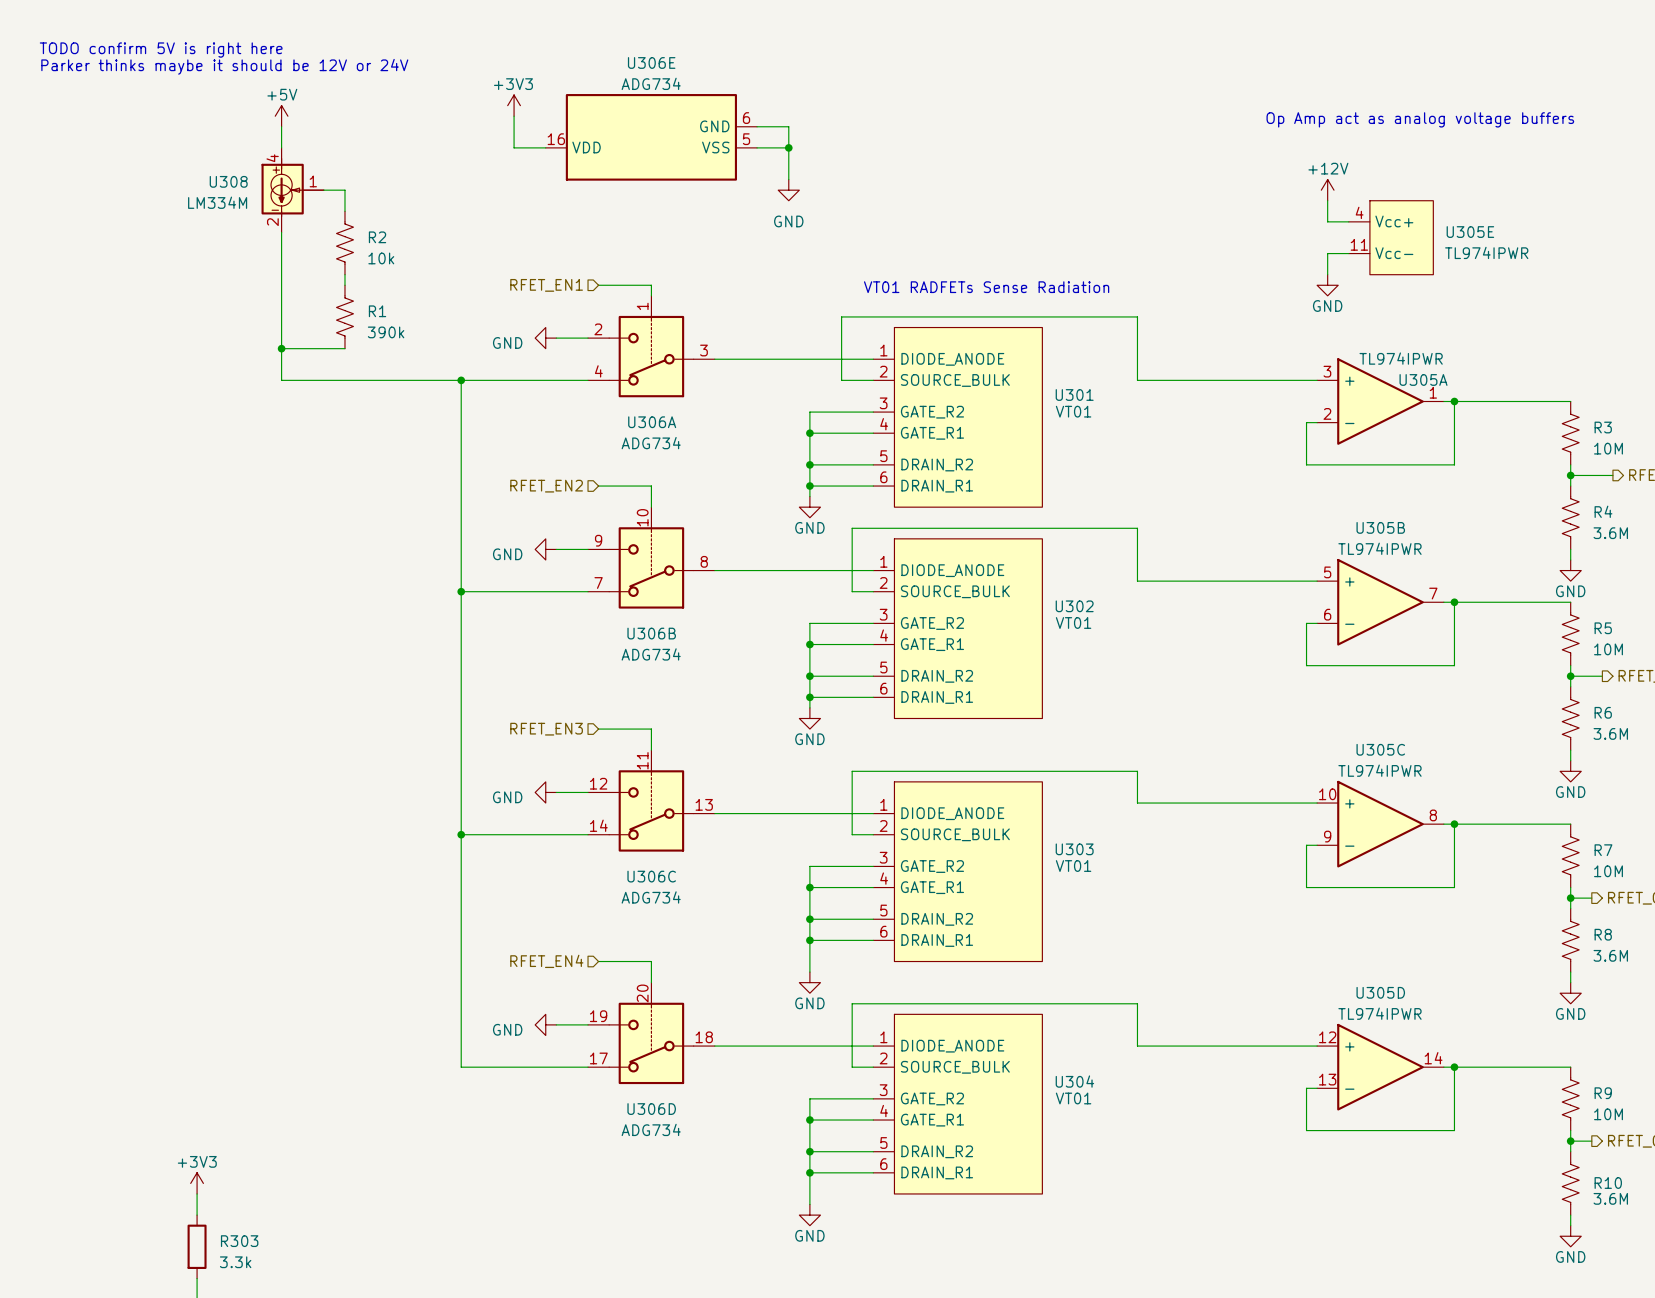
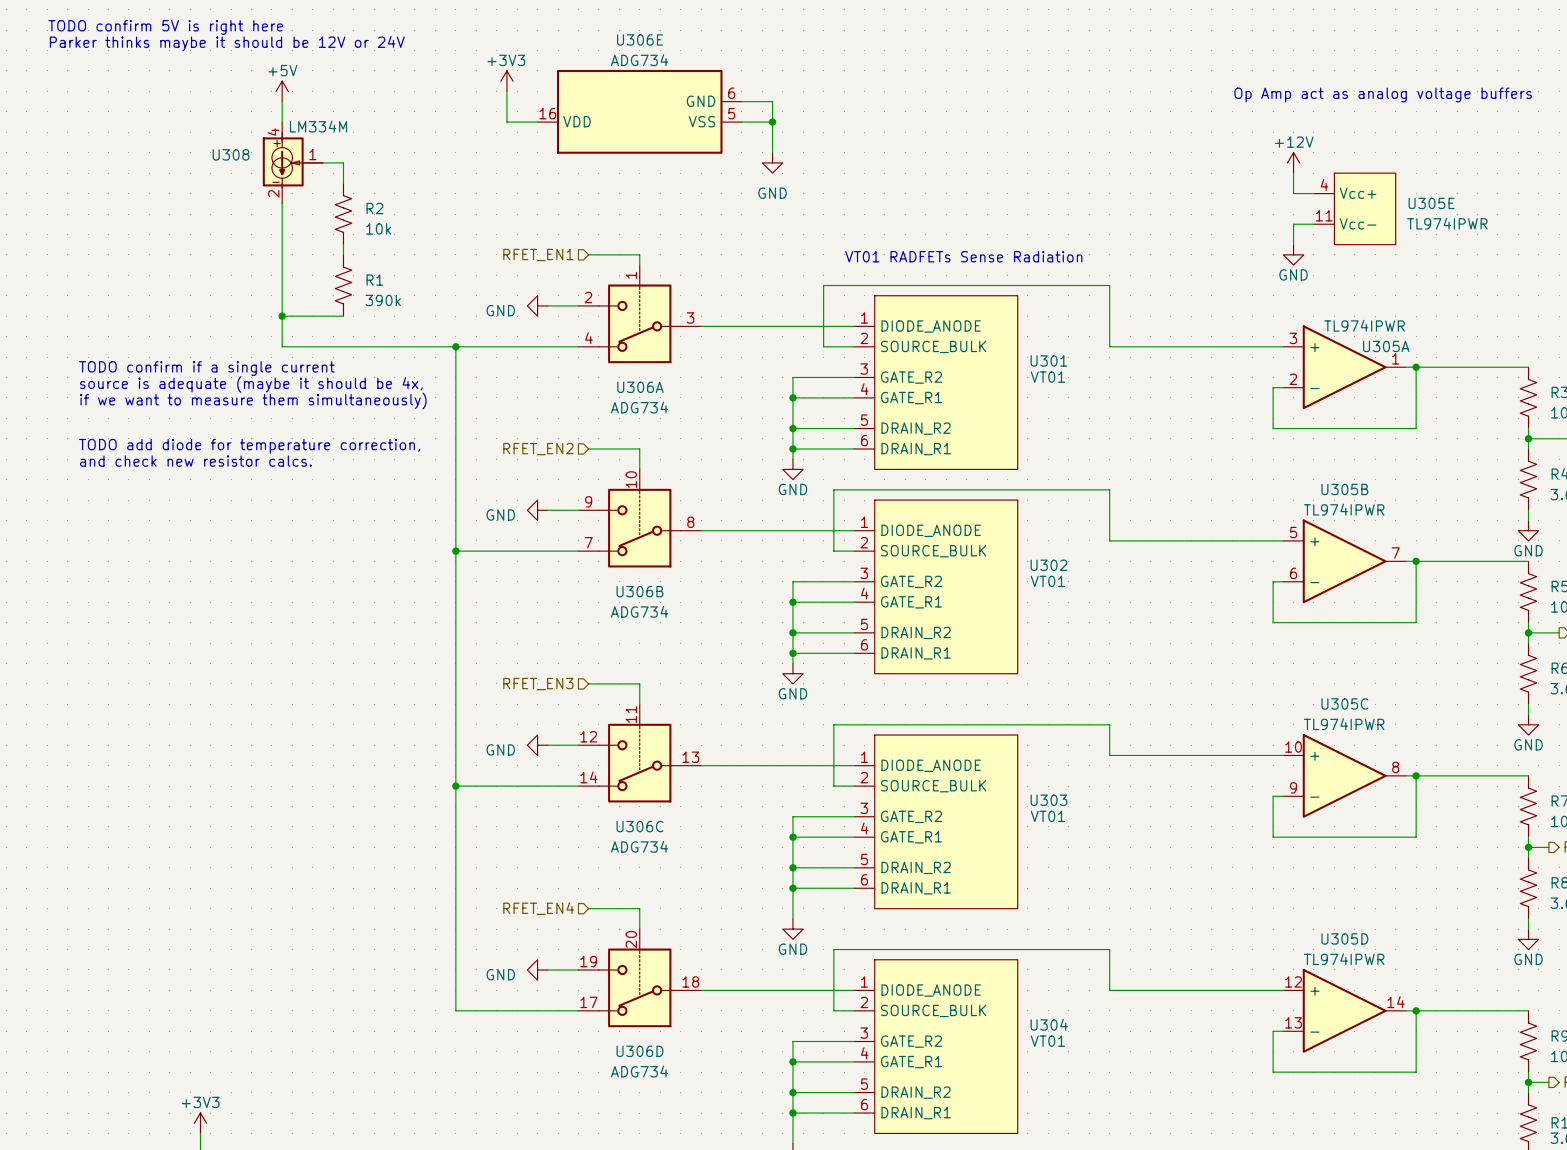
U308 value position: LM334M (217, 202) -> LM334M (318, 126)
text: none -> TODO confirm if a single current (206, 368)
text: none -> source is adequate (maybe it should be 4x, (251, 384)
text: none -> if we want to measure them simultaneously) (253, 400)
text: none -> TODO add diode for temperature correction, (249, 446)
text: none -> and check new resistor calcs. (195, 461)

